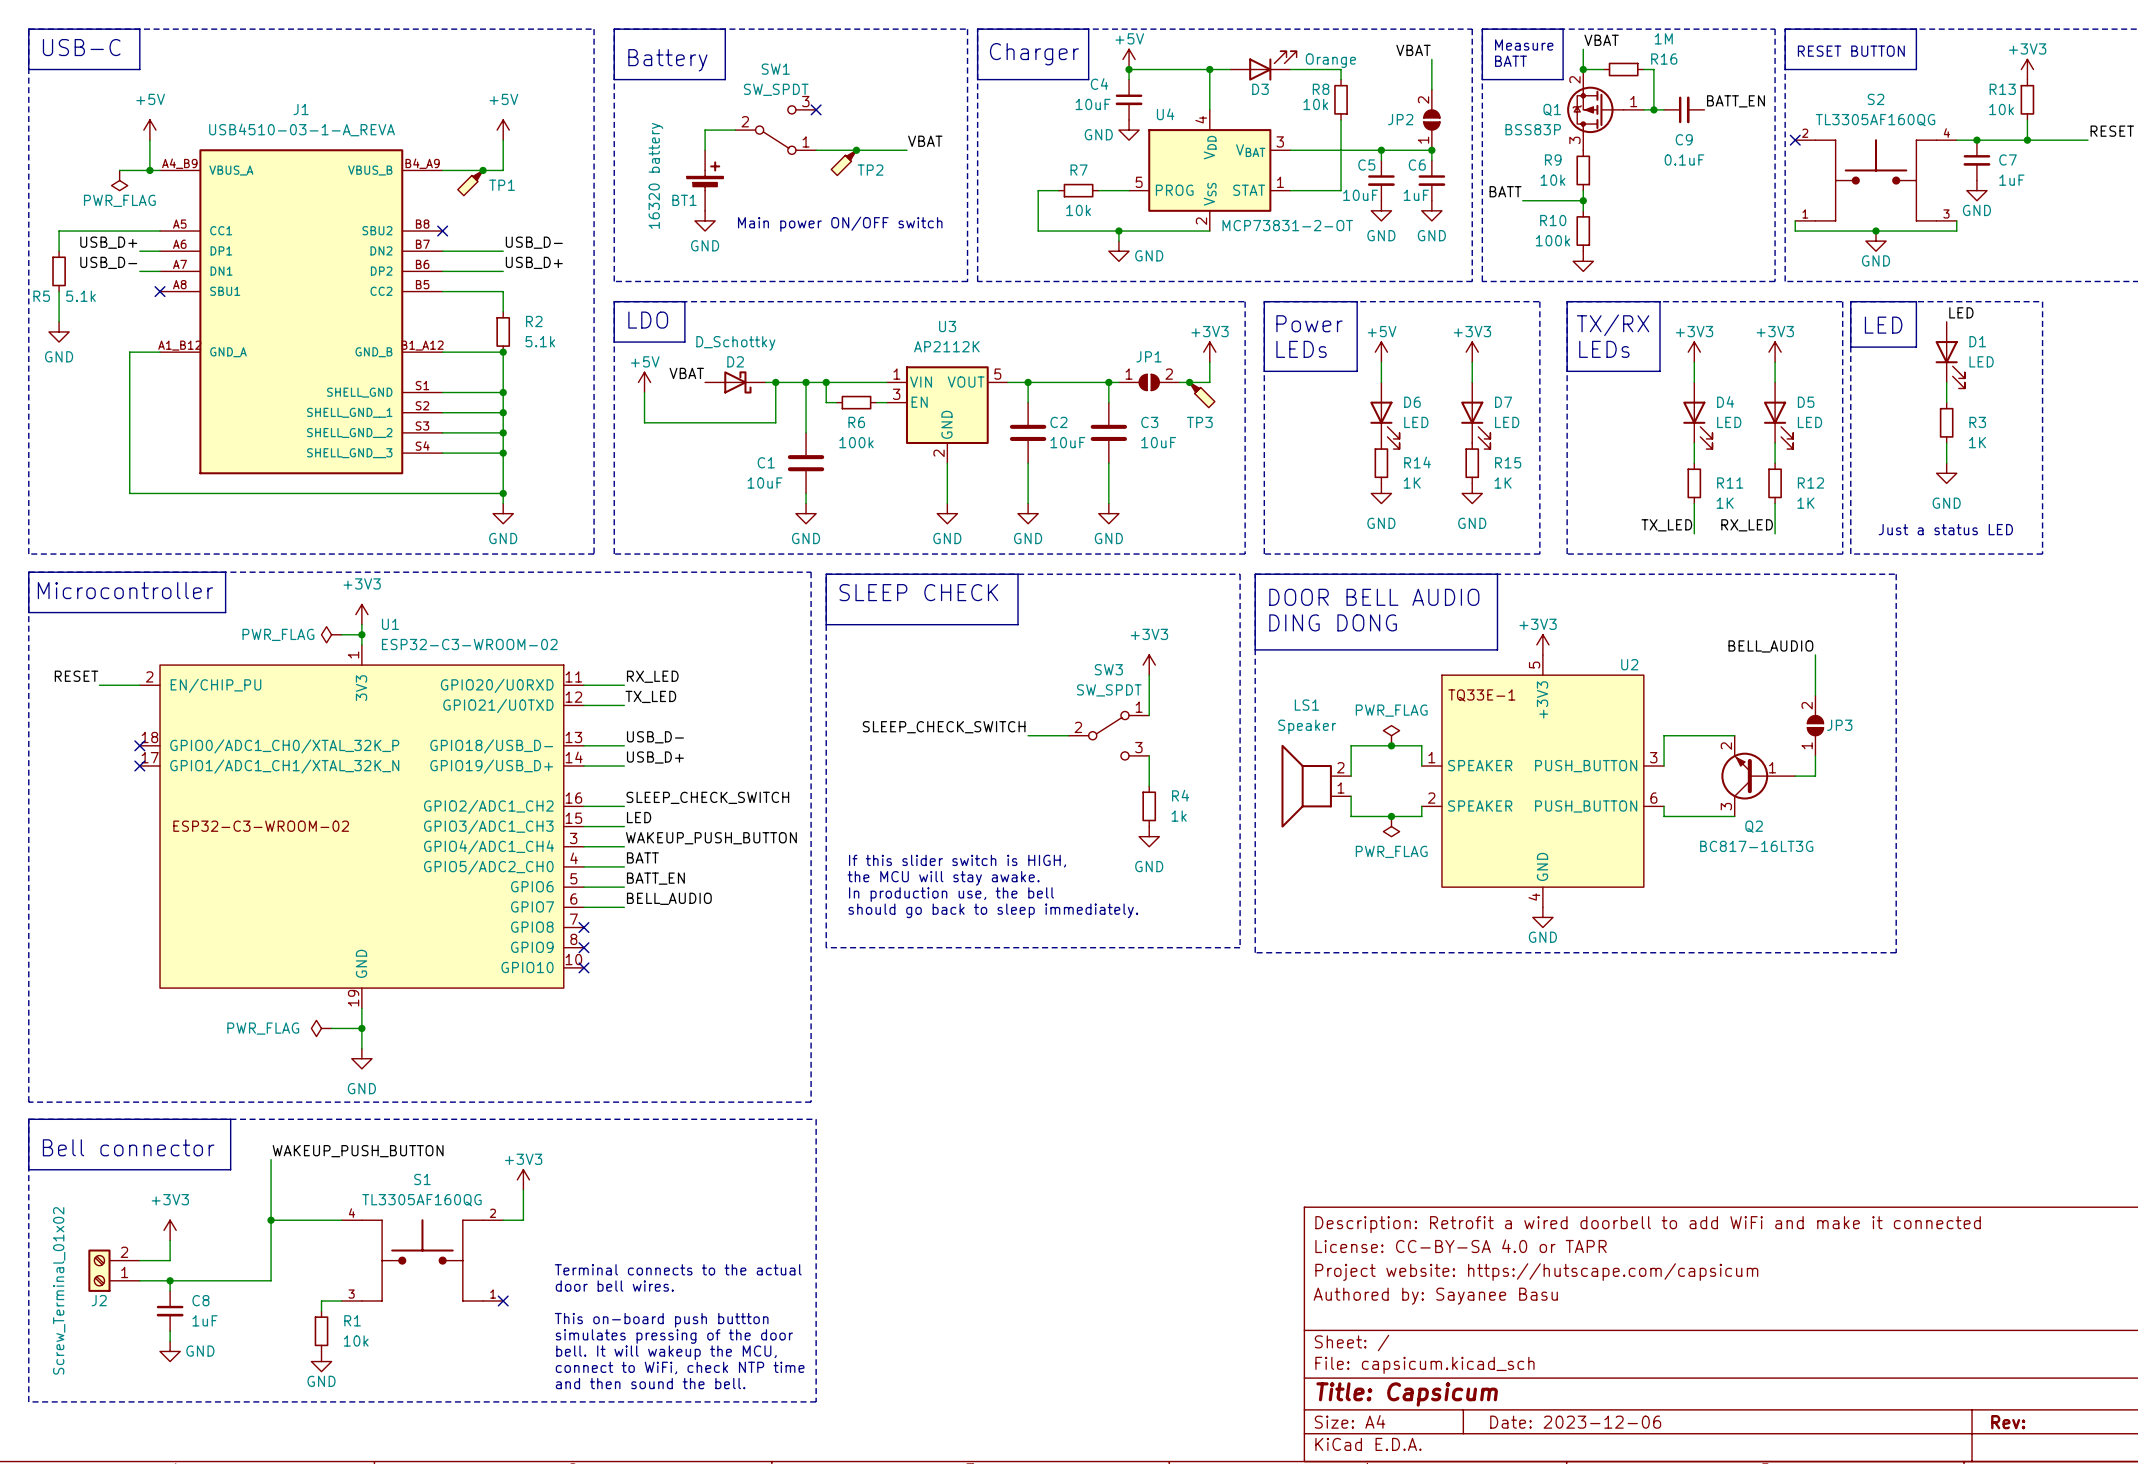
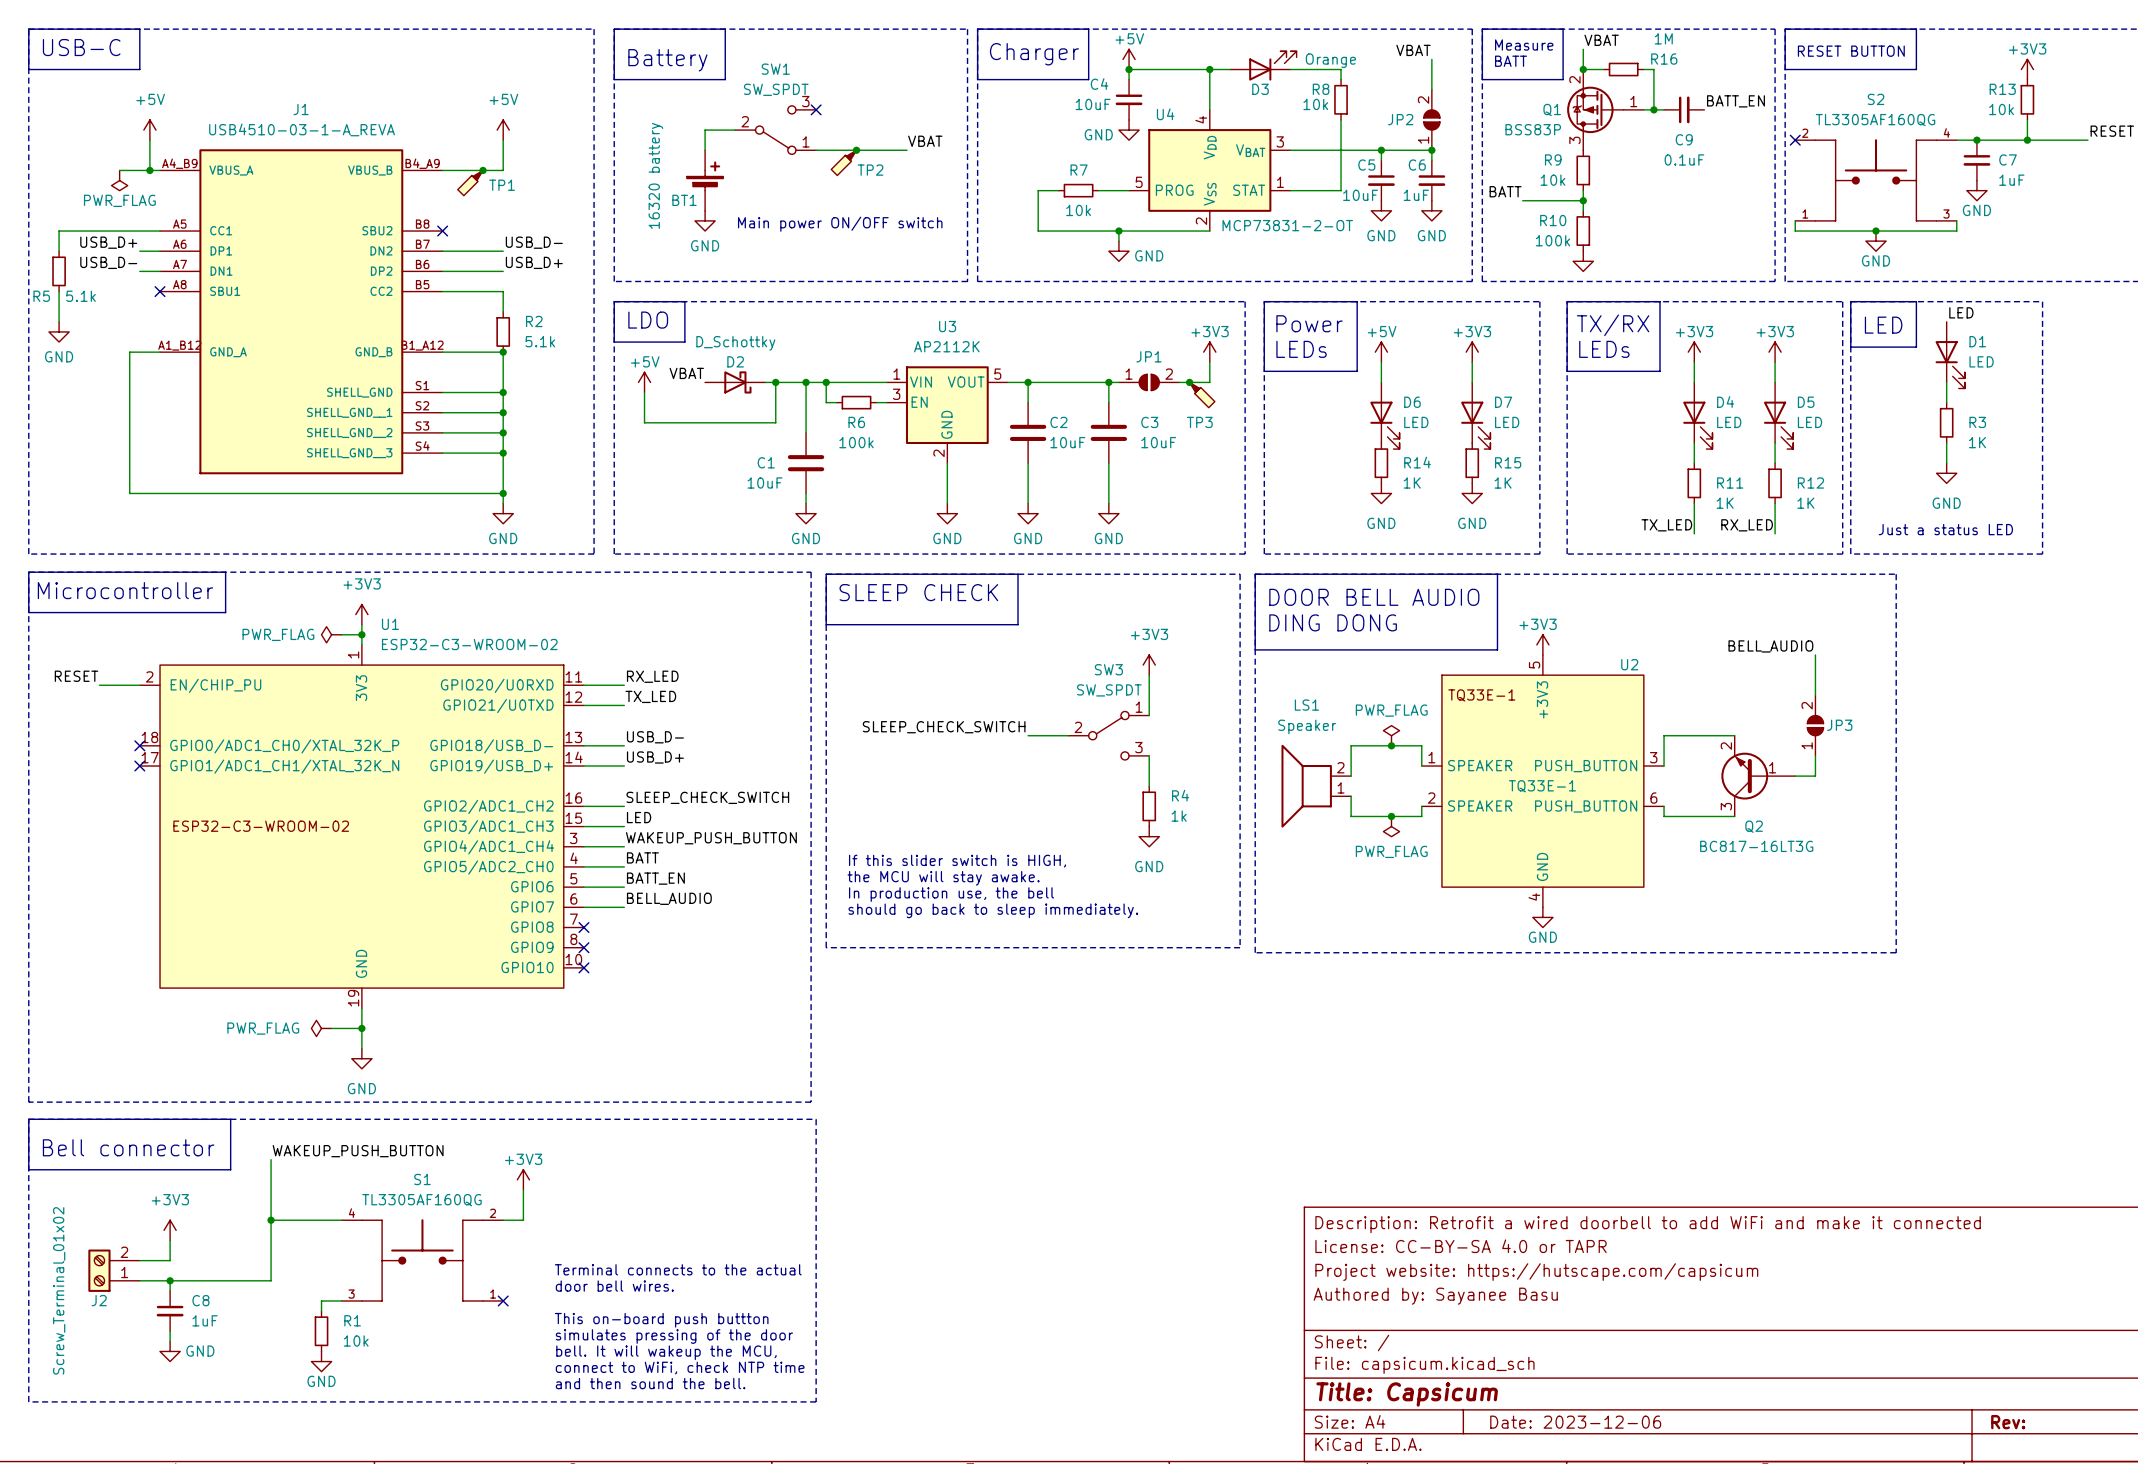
U2 value: none -> TQ33E-1 (1542, 786)

